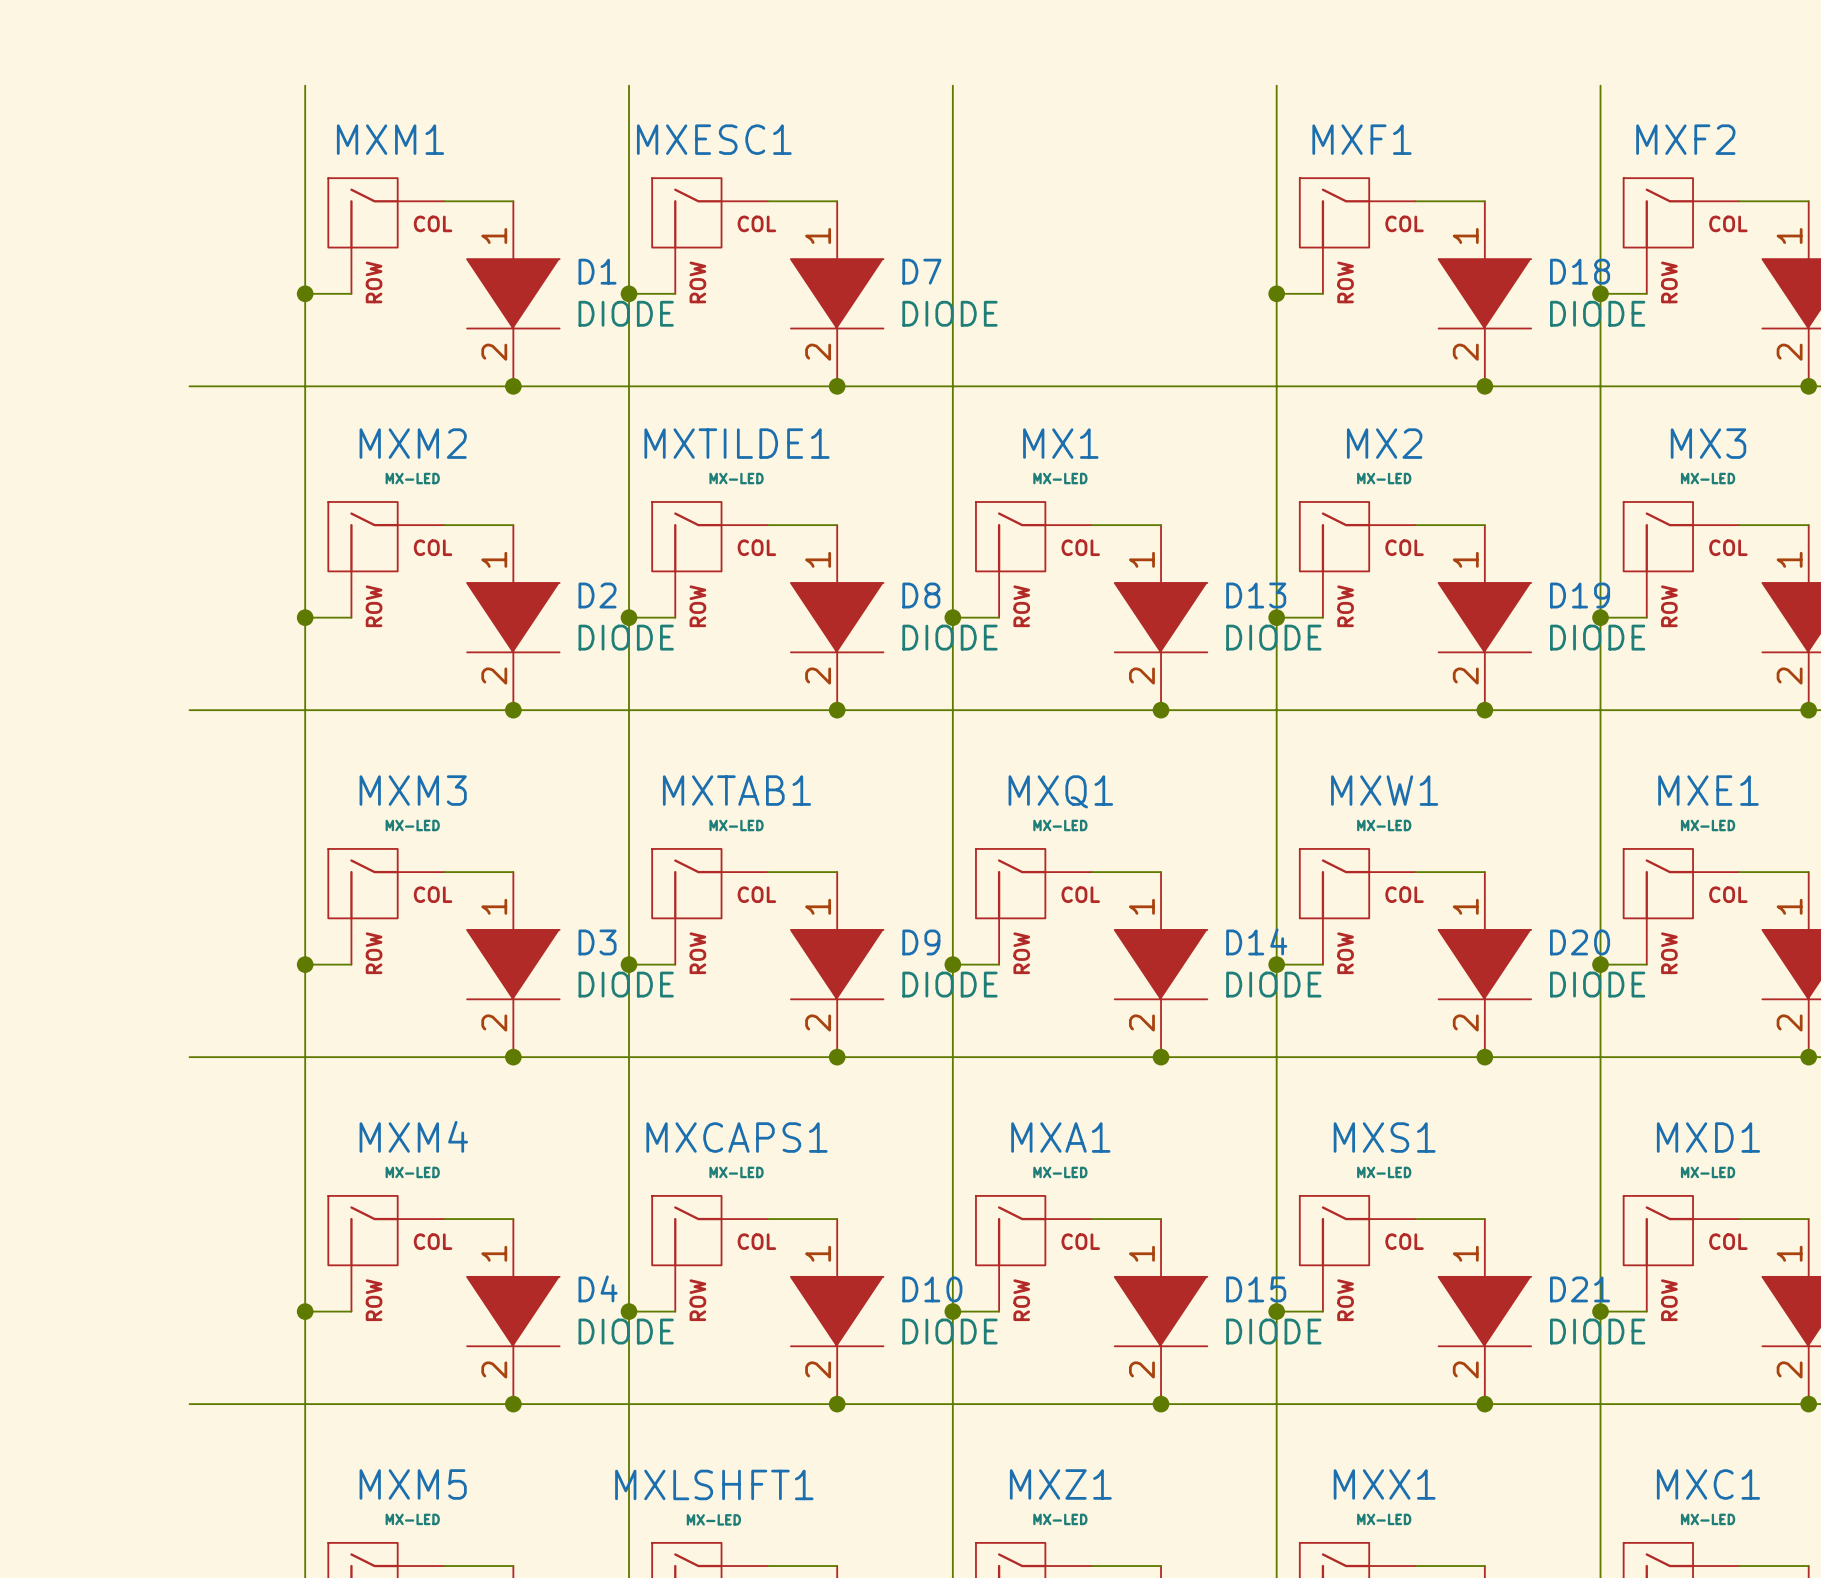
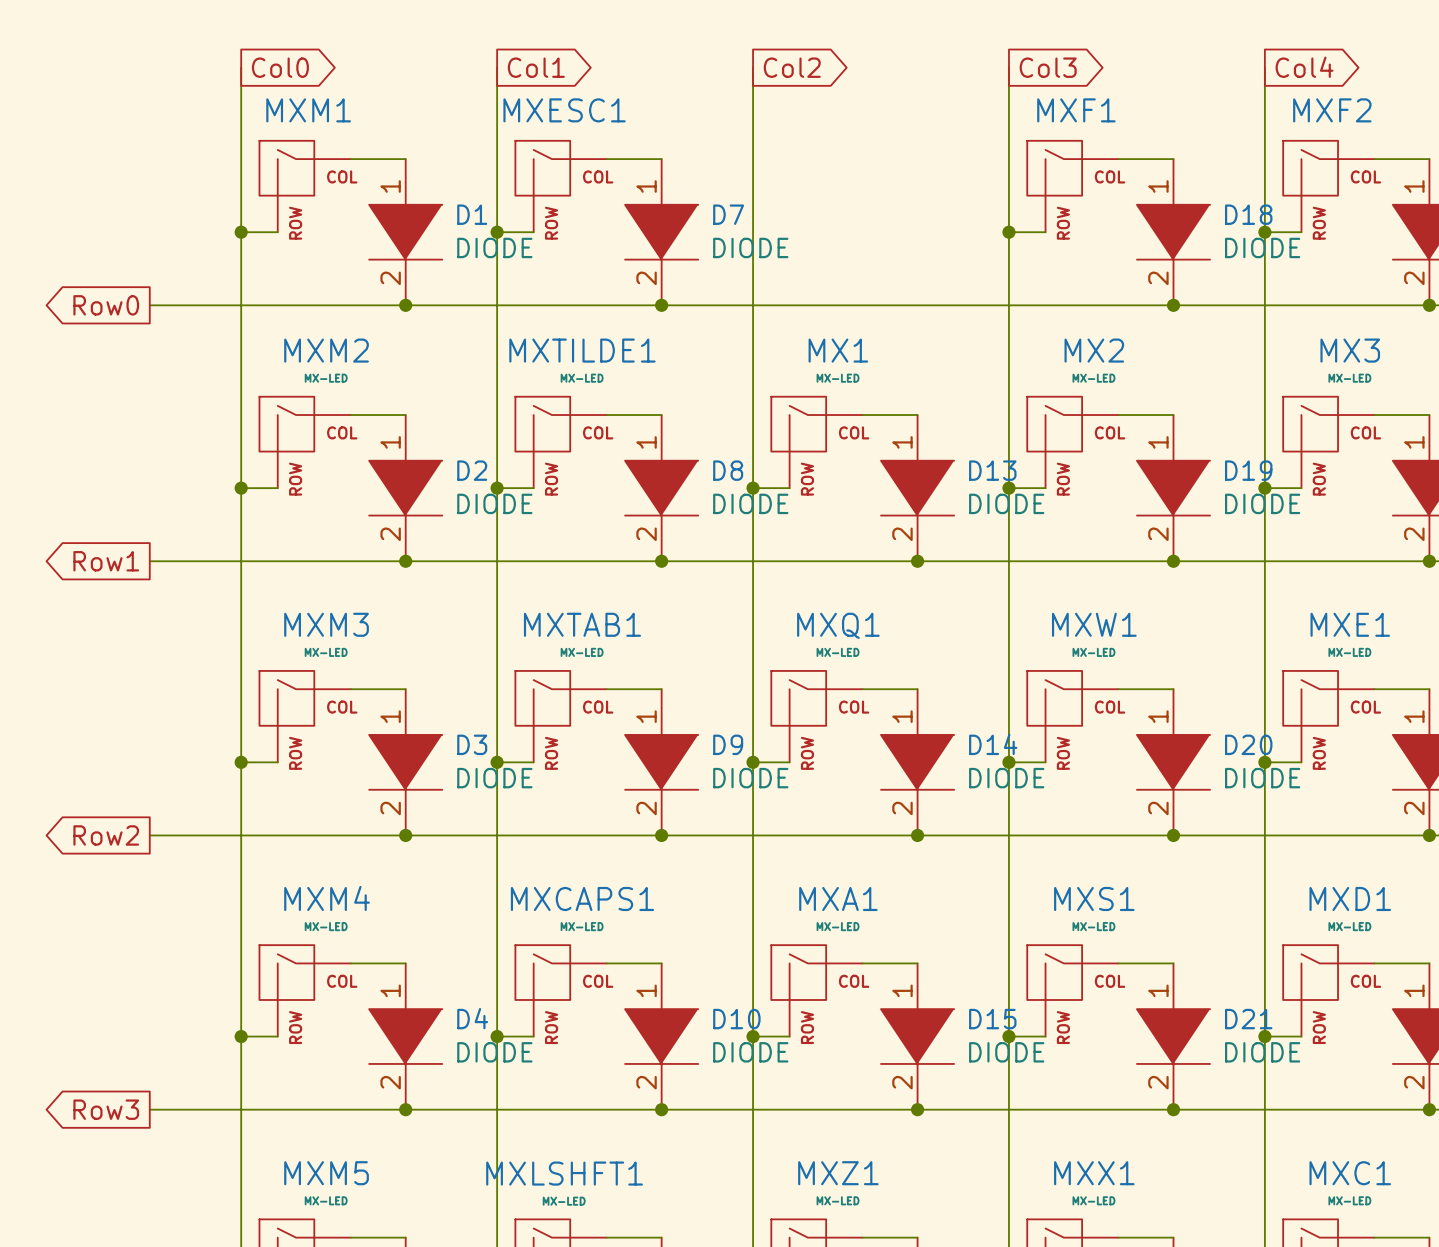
global label: none -> Col0 (280, 67)
global label: none -> Col1 (536, 67)
global label: none -> Col2 (792, 67)
global label: none -> Col3 (1048, 67)
global label: none -> Col4 (1304, 67)
global label: none -> Row0 (106, 305)
global label: none -> Row1 (106, 561)
global label: none -> Row2 (106, 835)
global label: none -> Row3 (106, 1109)

